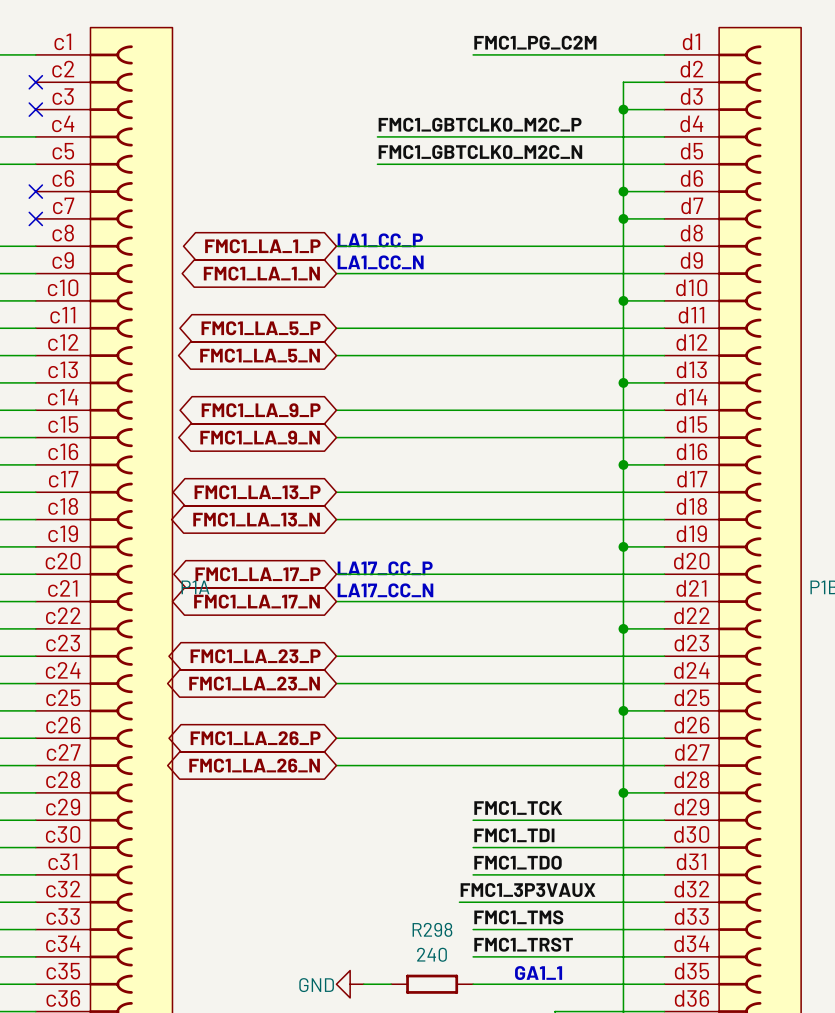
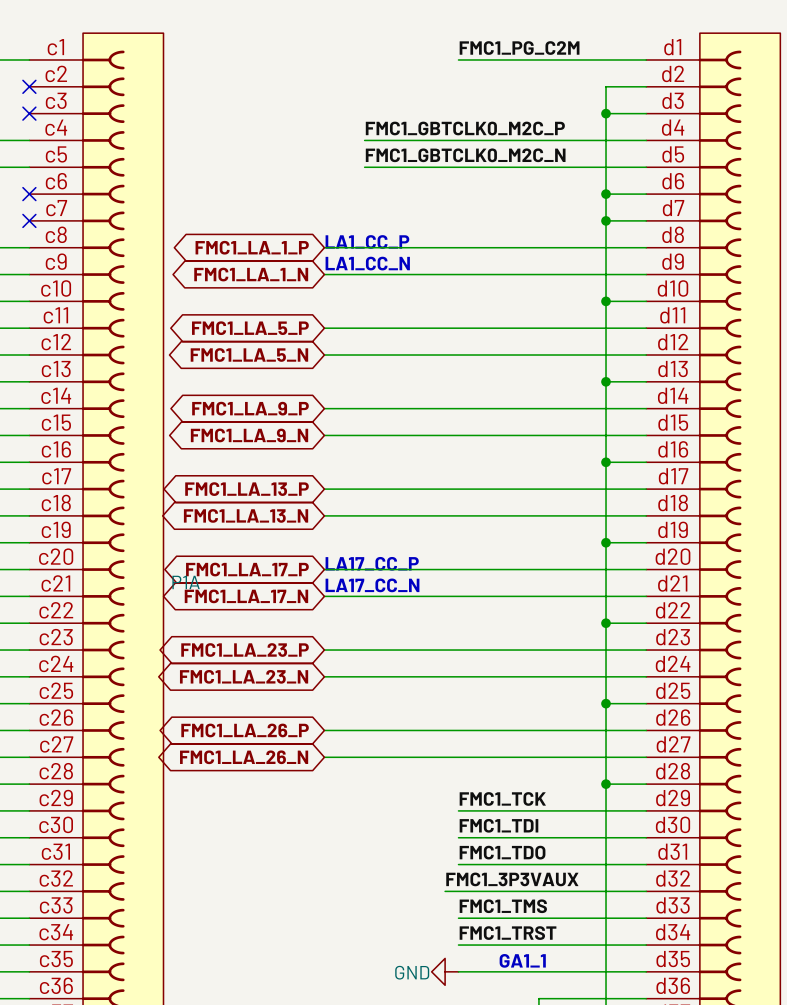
power symbol position: GND (350, 984) -> GND (445, 971)
wire: (363, 984) (391, 984) -> none
R298: (432, 984) -> none

